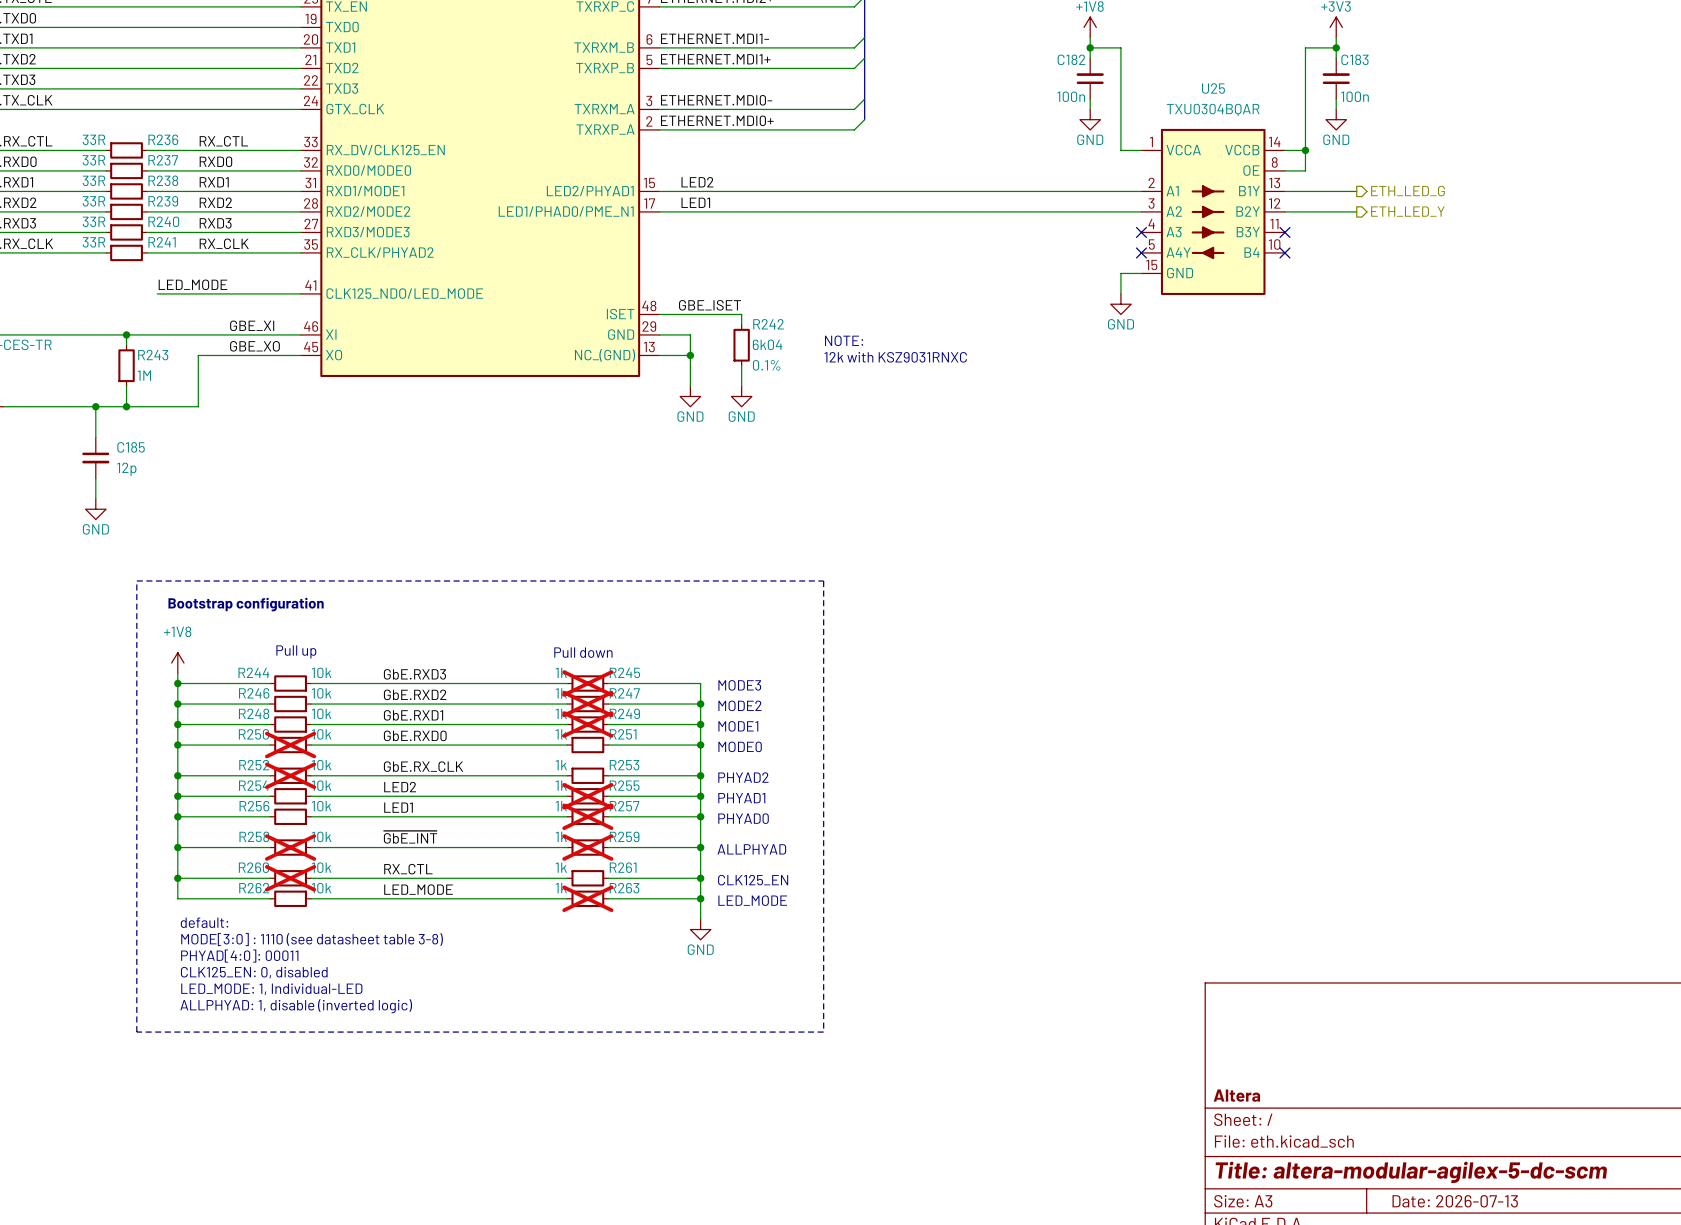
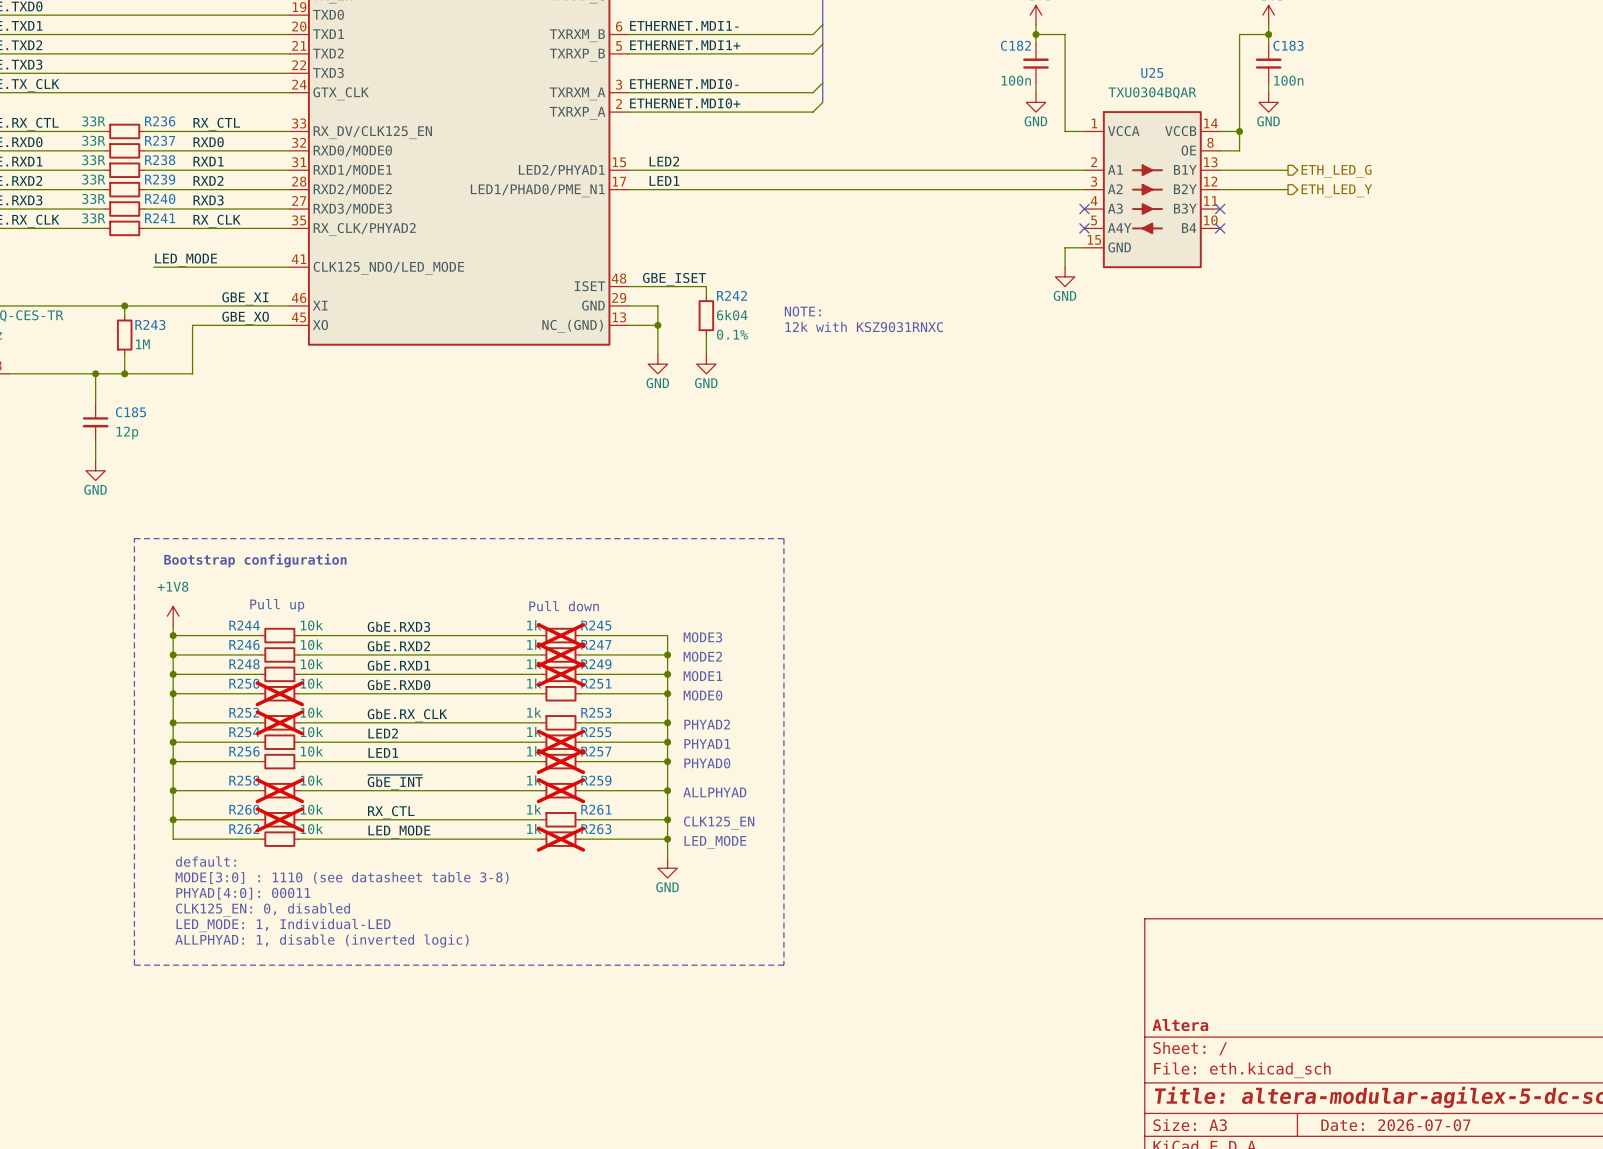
title block: Date: 2026-07-13 (1455, 1201) -> Date: 2026-07-07 (1395, 1125)

